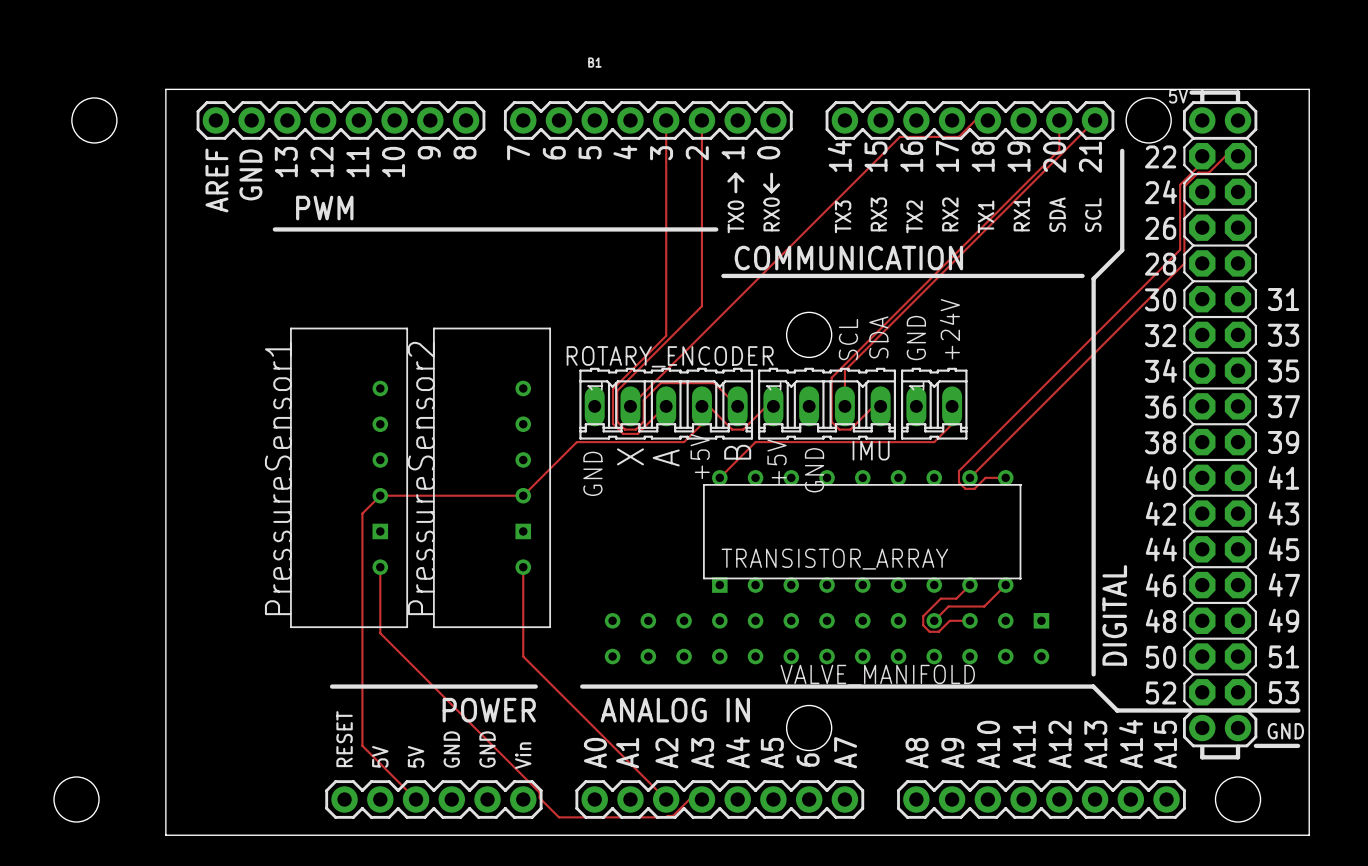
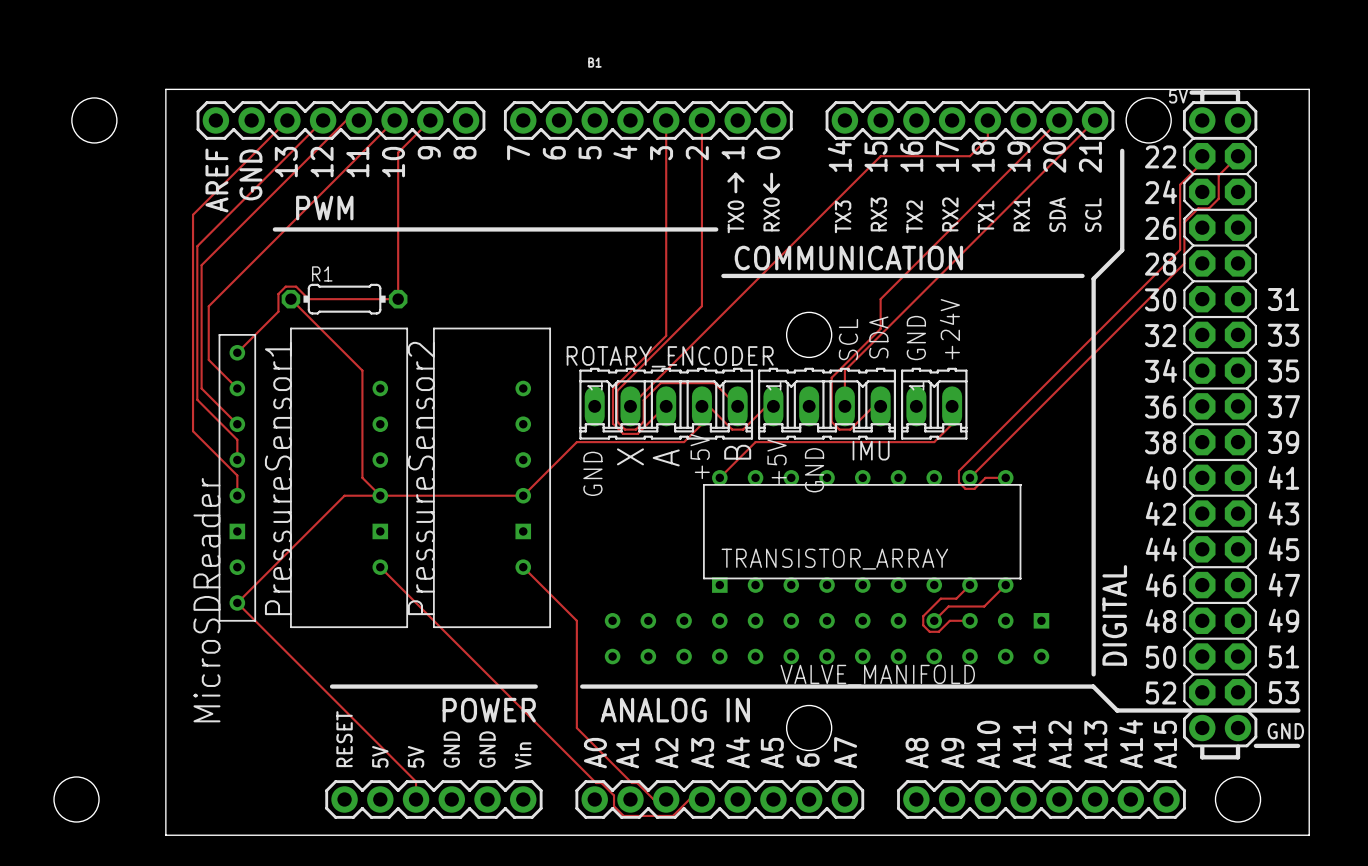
track: none -> (287, 120) (193, 214) (193, 431) (237, 475) (237, 495)
track: none -> (323, 120) (197, 246) (197, 399) (237, 439) (237, 459)
track: none -> (358, 120) (346, 120) (201, 265) (201, 388) (237, 424)
track: none -> (394, 120) (208, 306) (208, 359) (237, 388) (237, 386)
track: none -> (430, 120) (398, 152) (398, 299) (308, 299) (296, 286) (285, 286) (278, 293) (278, 311) (237, 352)
track: (987, 120) (975, 120) (958, 136) (899, 136) (880, 156) -> (987, 120) (987, 138) (969, 156) (880, 156)
track: (1059, 120) (1059, 150) (880, 328) -> (1059, 120) (880, 299) (880, 328)
track: (1238, 156) (1225, 156) (1209, 172) (1198, 172) (1184, 186) (1184, 222) -> (1238, 156) (1218, 175) (1218, 198) (1209, 208) (1198, 208) (1184, 222)
R1: none -> (344, 299)
part: none -> (237, 477)
track: (380, 495) (362, 513) (362, 745) (416, 799) -> (290, 299) (362, 370) (362, 477) (380, 495) (344, 495) (237, 602) (416, 781) (416, 799)
track: (380, 567) (380, 633) (539, 792) (539, 798) (558, 817) (667, 815) -> (380, 567) (596, 783) (601, 783) (614, 795) (614, 806) (623, 815) (667, 815)
track: (523, 567) (523, 656) (666, 799) -> (523, 567) (576, 620) (576, 728) (631, 783) (637, 783) (653, 799) (666, 799)
text: none -> MicroSDReader (206, 600)

